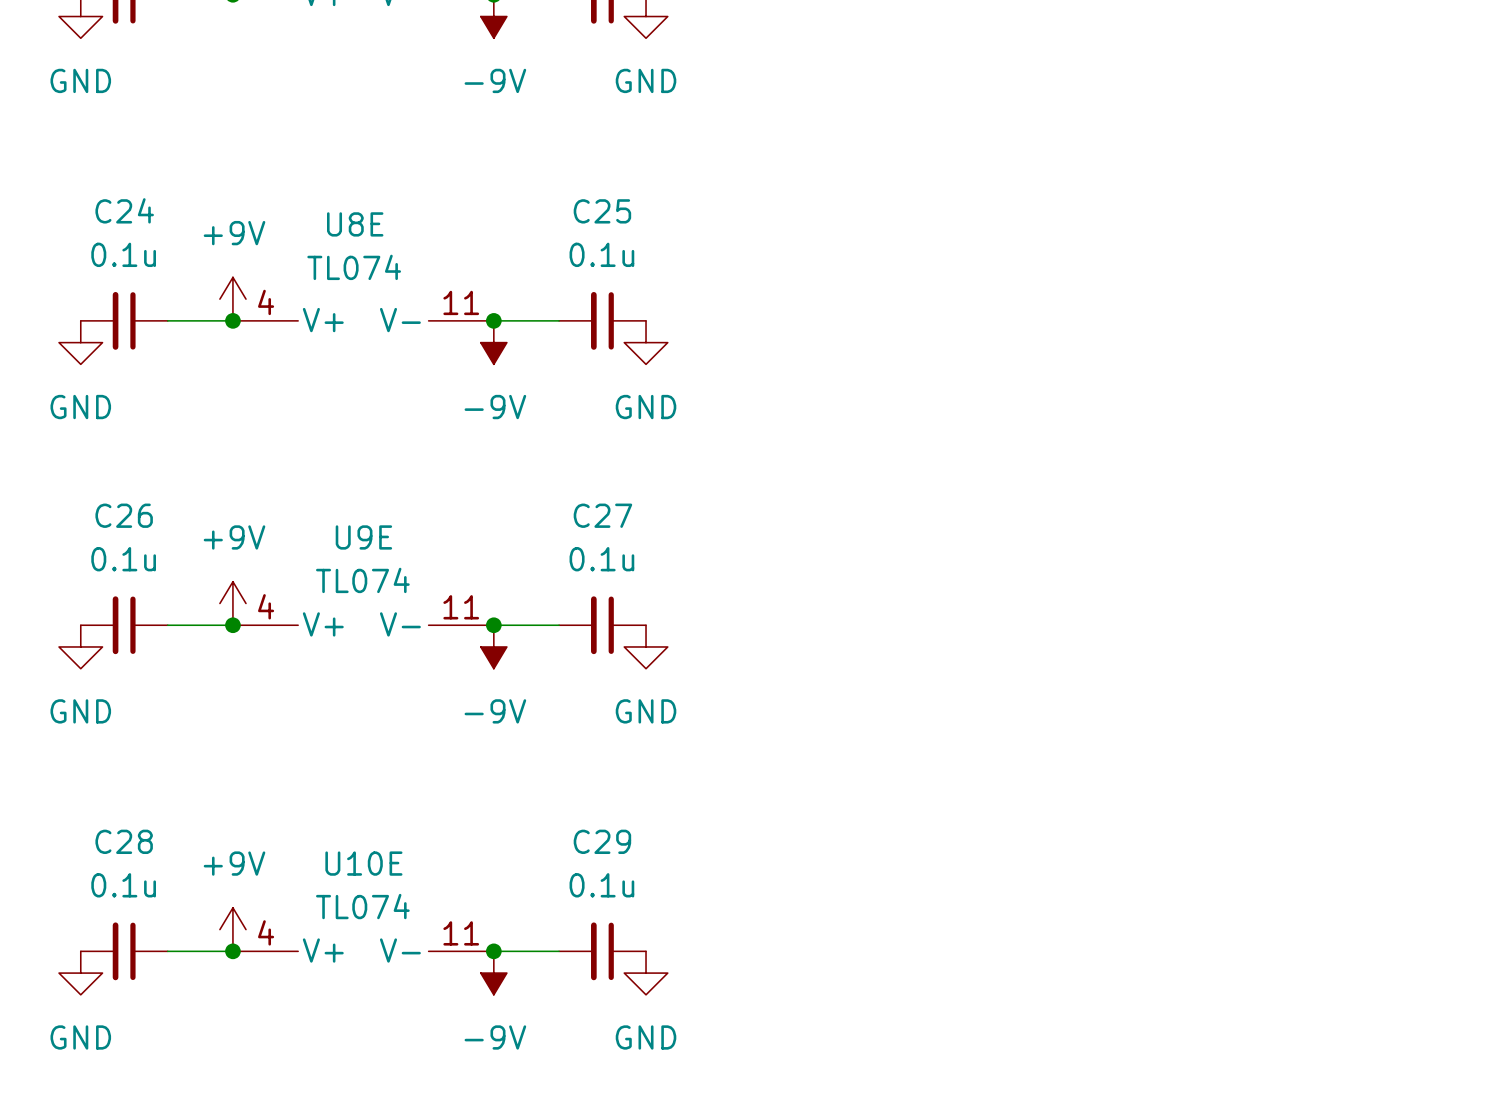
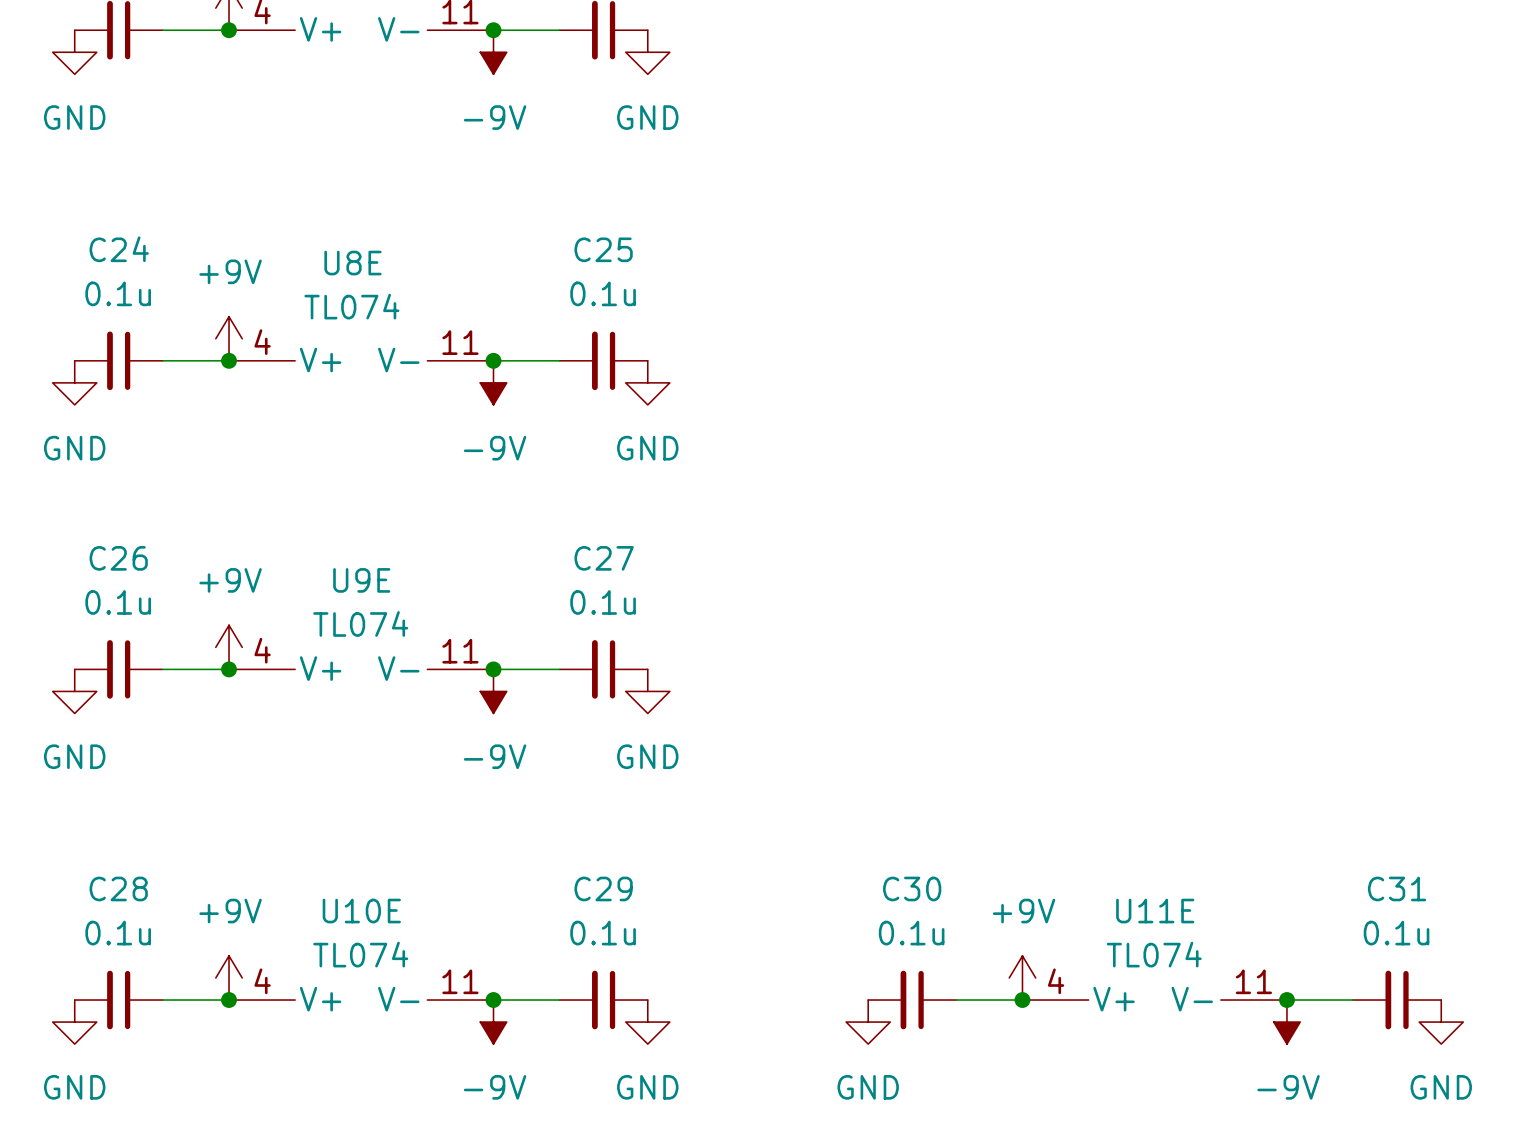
power symbol: none -> +9V (1022, 977)
C30: none -> 0.1u (912, 1000)
wire: none -> (956, 1000) (1022, 1000)
junction: none -> (1022, 1000)
U11E: none -> TL074 (1154, 1000)
wire: none -> (1286, 1000) (1353, 1000)
junction: none -> (1286, 1000)
C31: none -> 0.1u (1397, 1000)
power symbol: none -> GND (868, 1022)
power symbol: none -> -9V (1286, 1022)
power symbol: none -> GND (1441, 1022)

